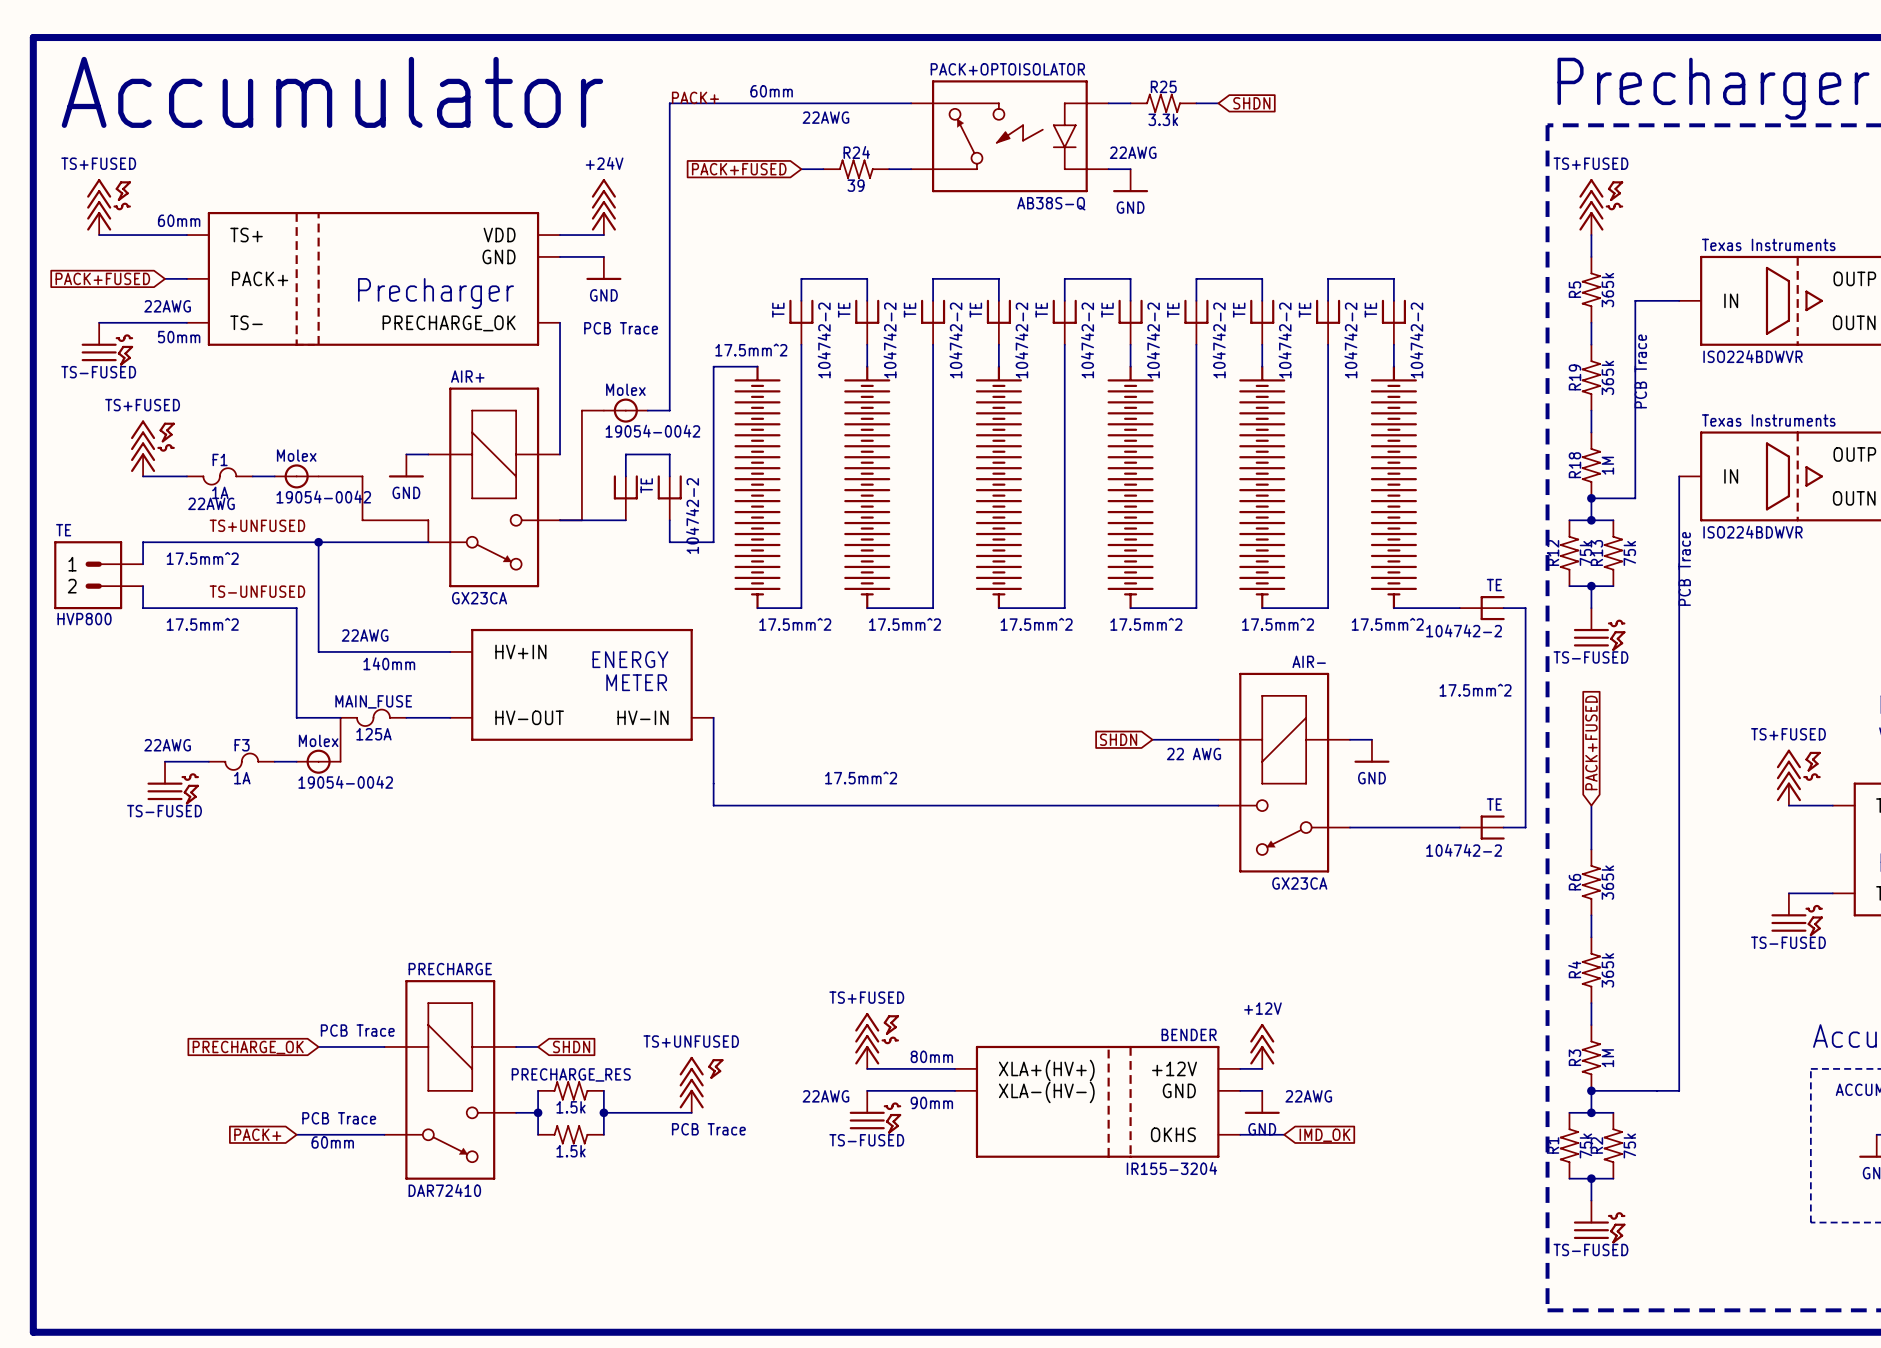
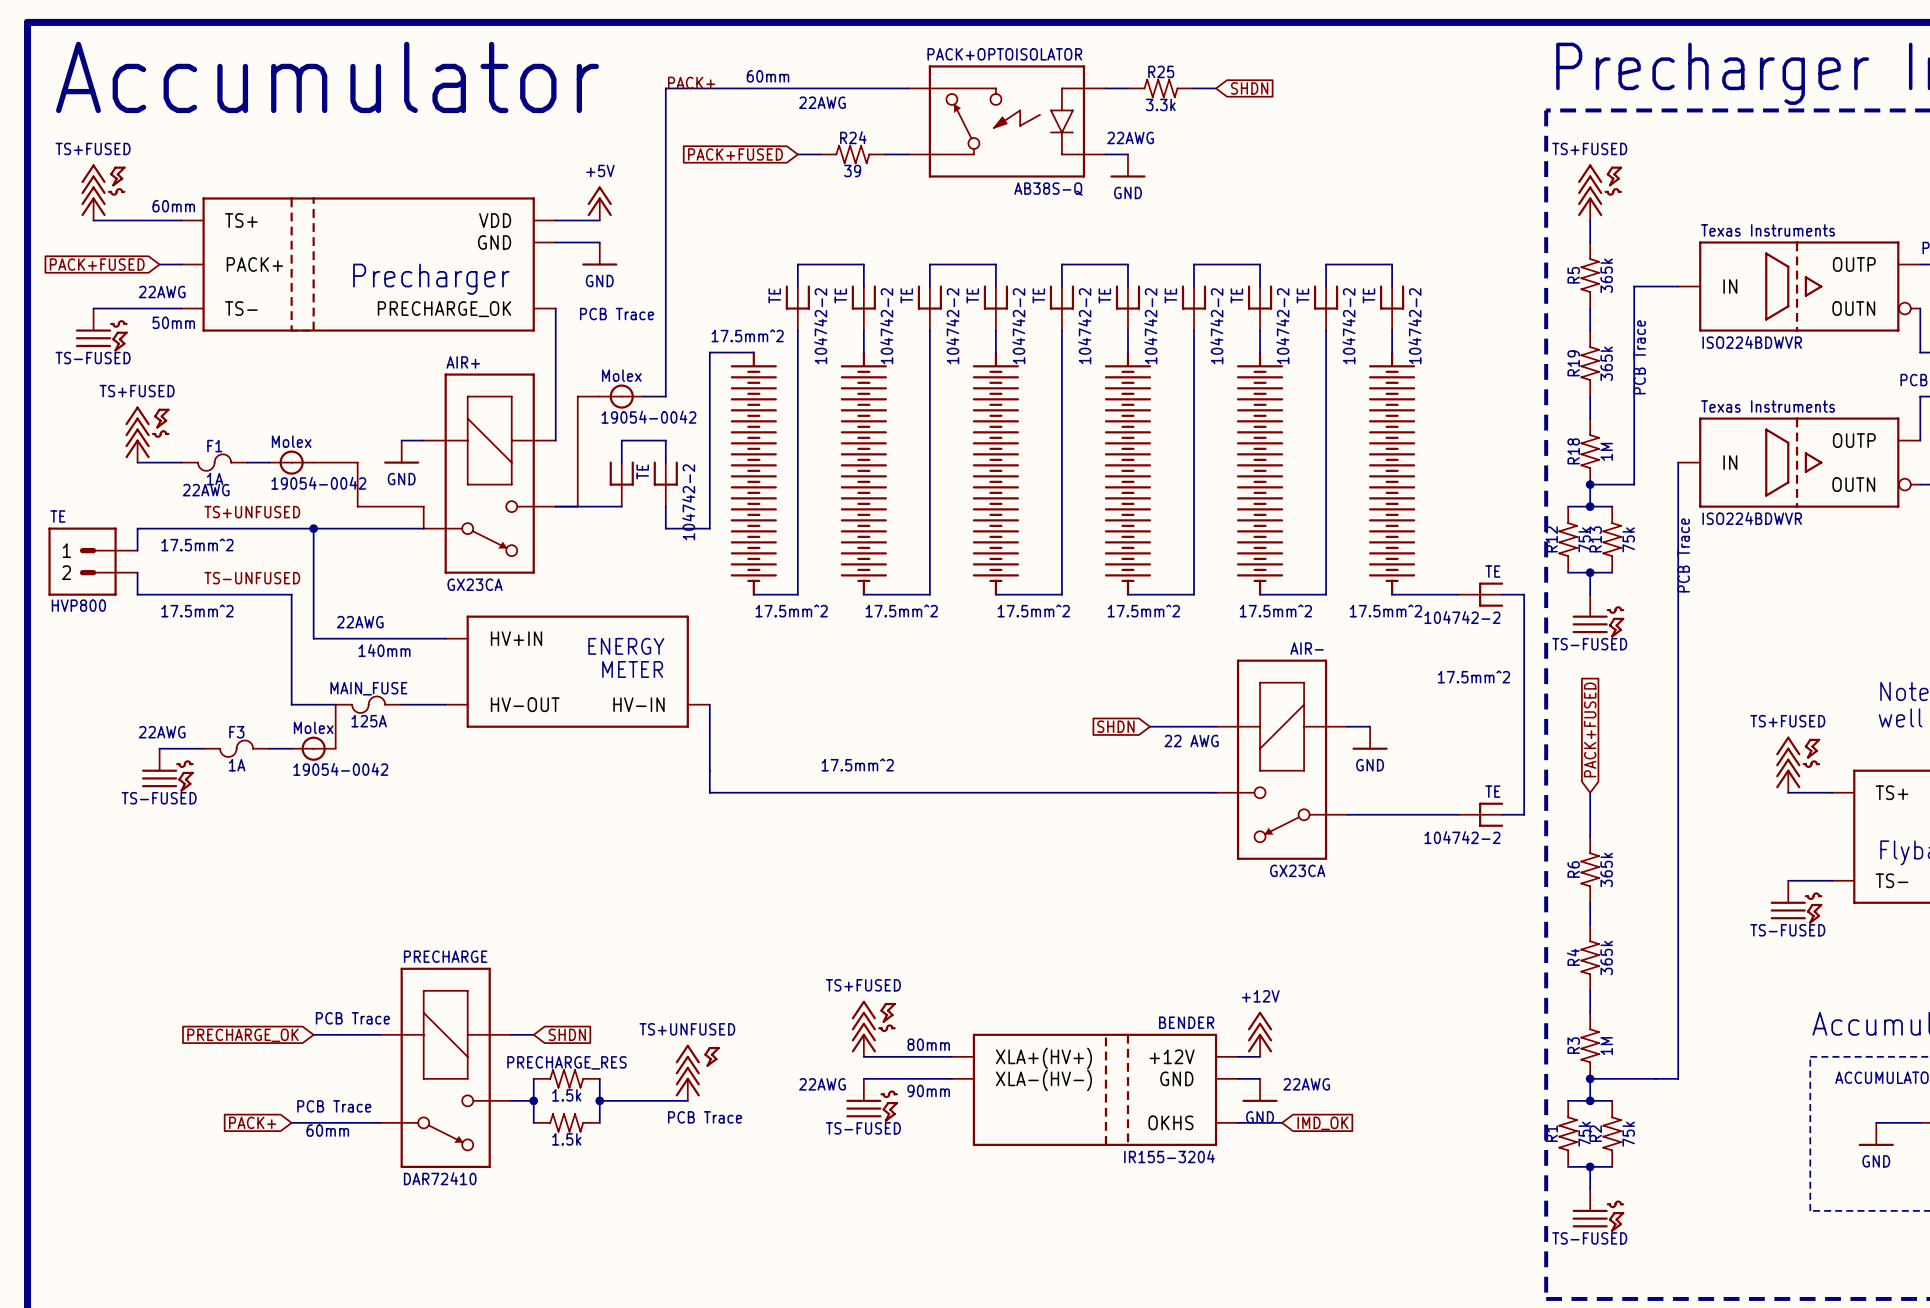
power symbol: +24V (603, 207) -> none
power symbol: none -> +5V (599, 203)

